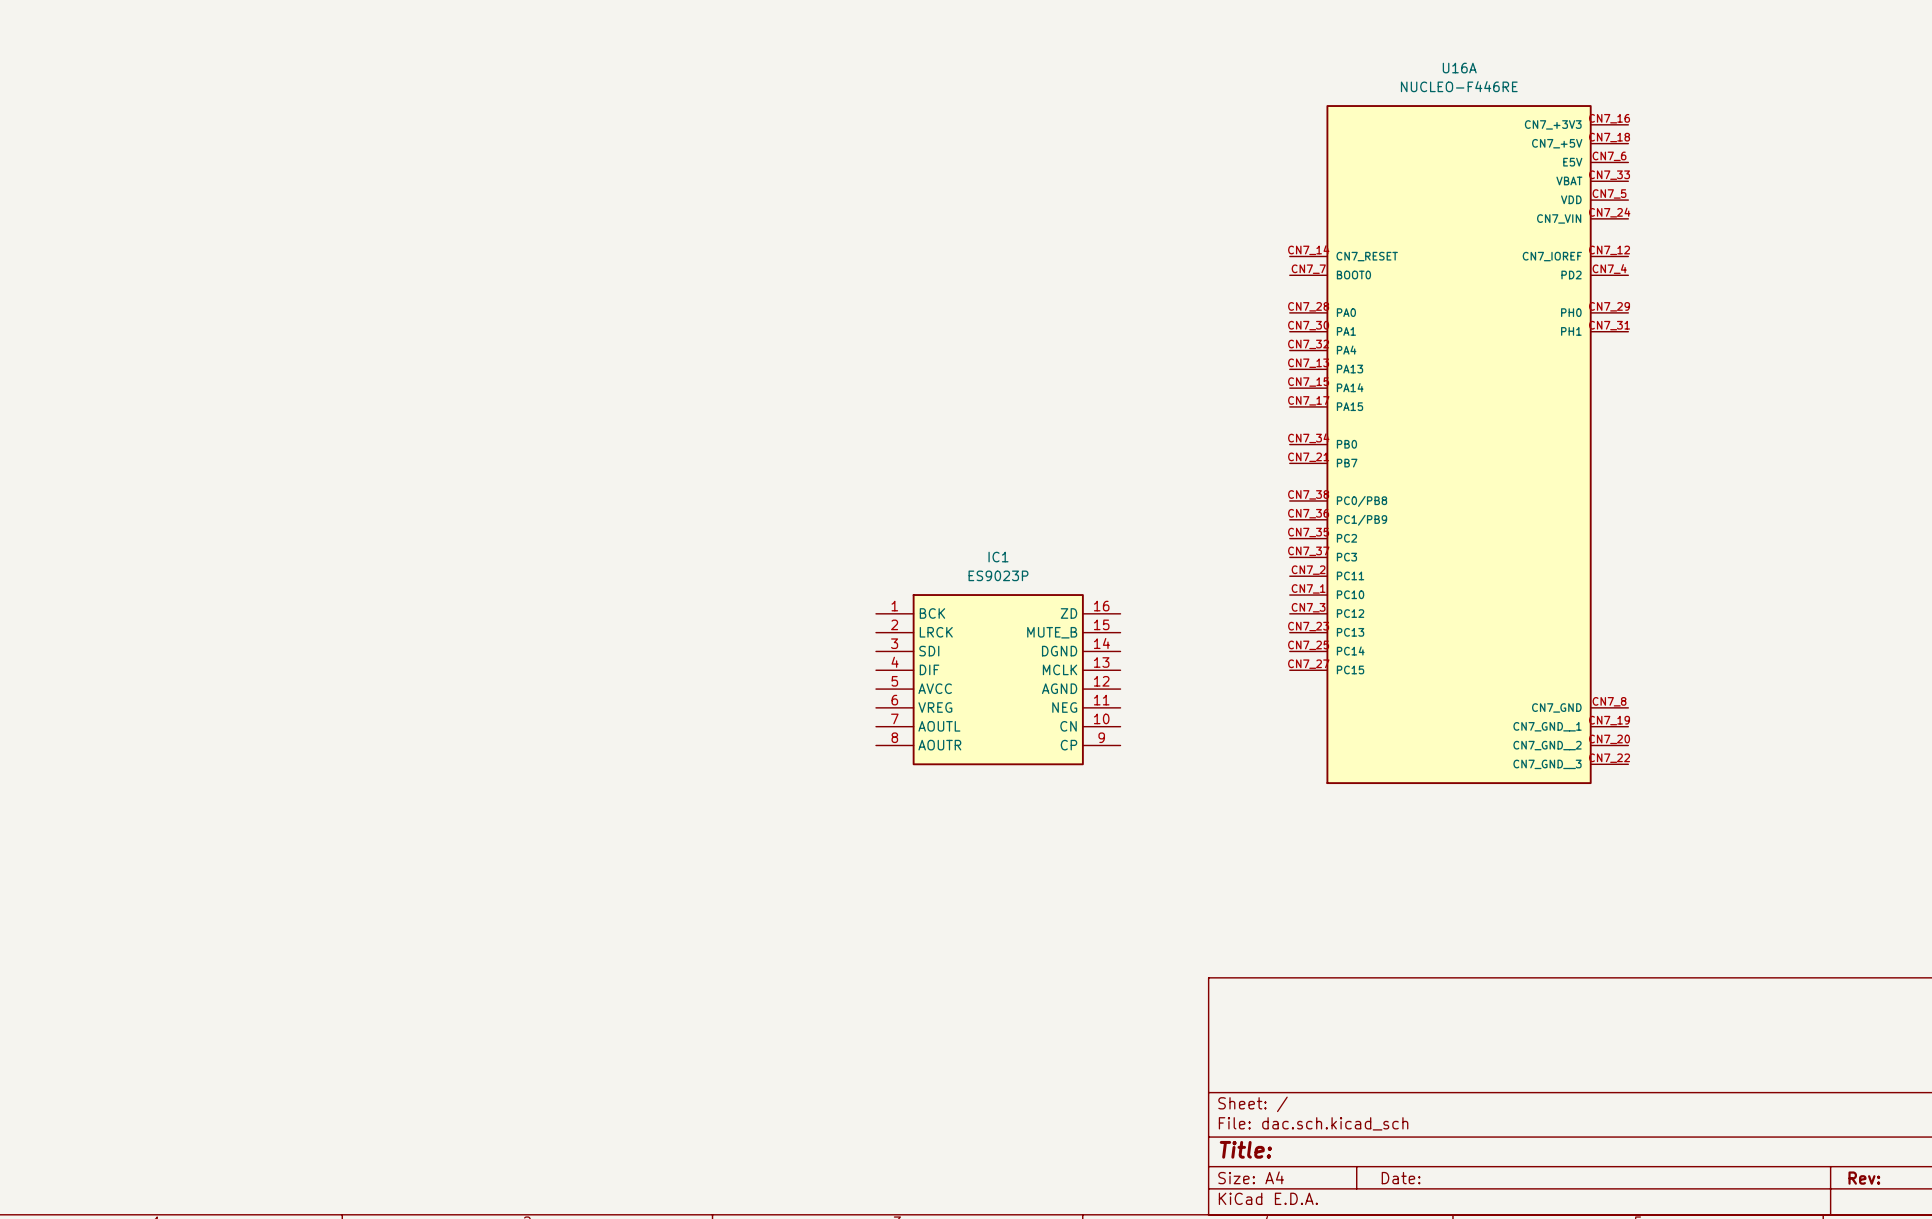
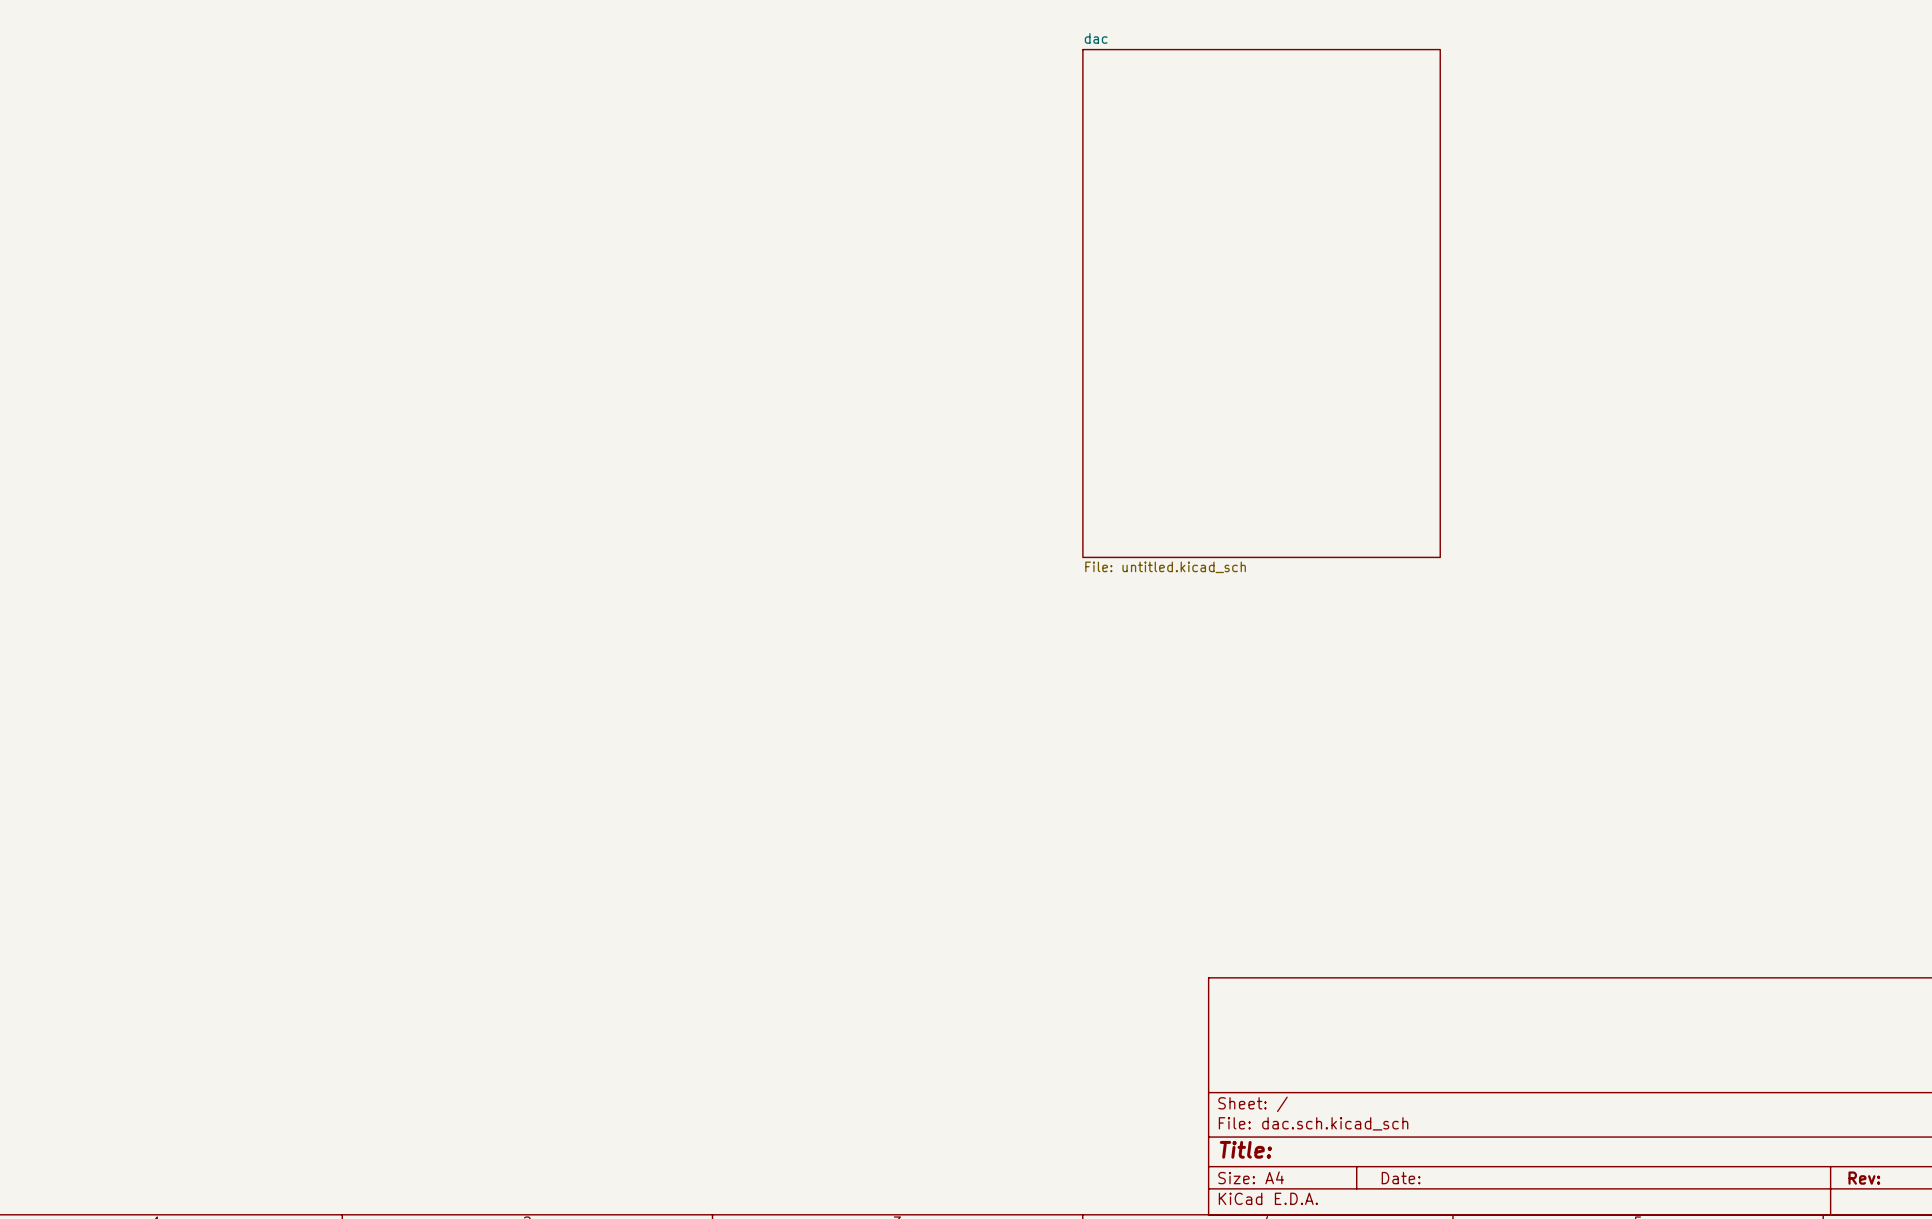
sheet dac: none -> File: untitled.kicad_sch (1261, 303)
U16A: NUCLEO-F446RE (1459, 444) -> none
IC1: ES9023P (998, 679) -> none

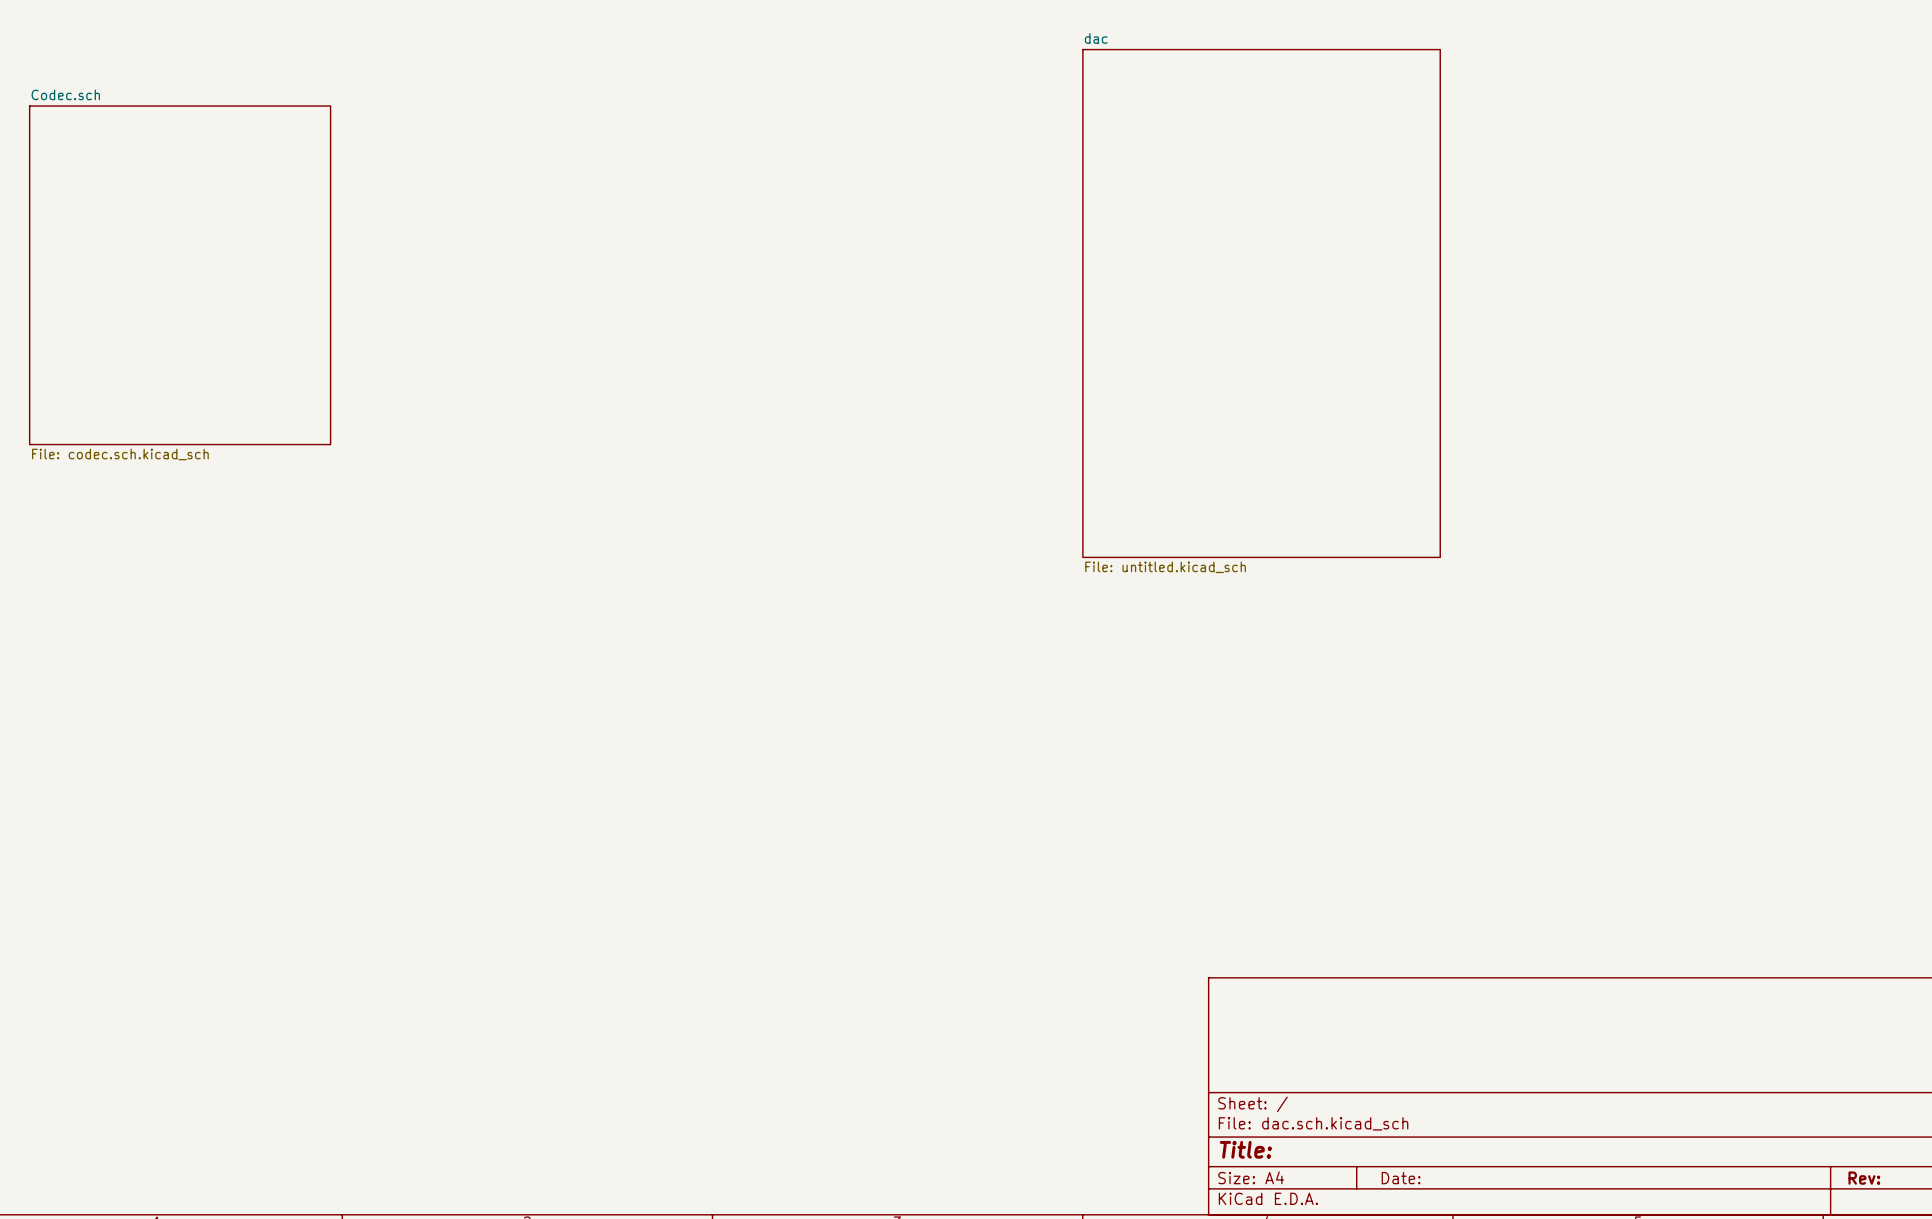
sheet Codec.sch: none -> File: codec.sch.kicad_sch (180, 275)

